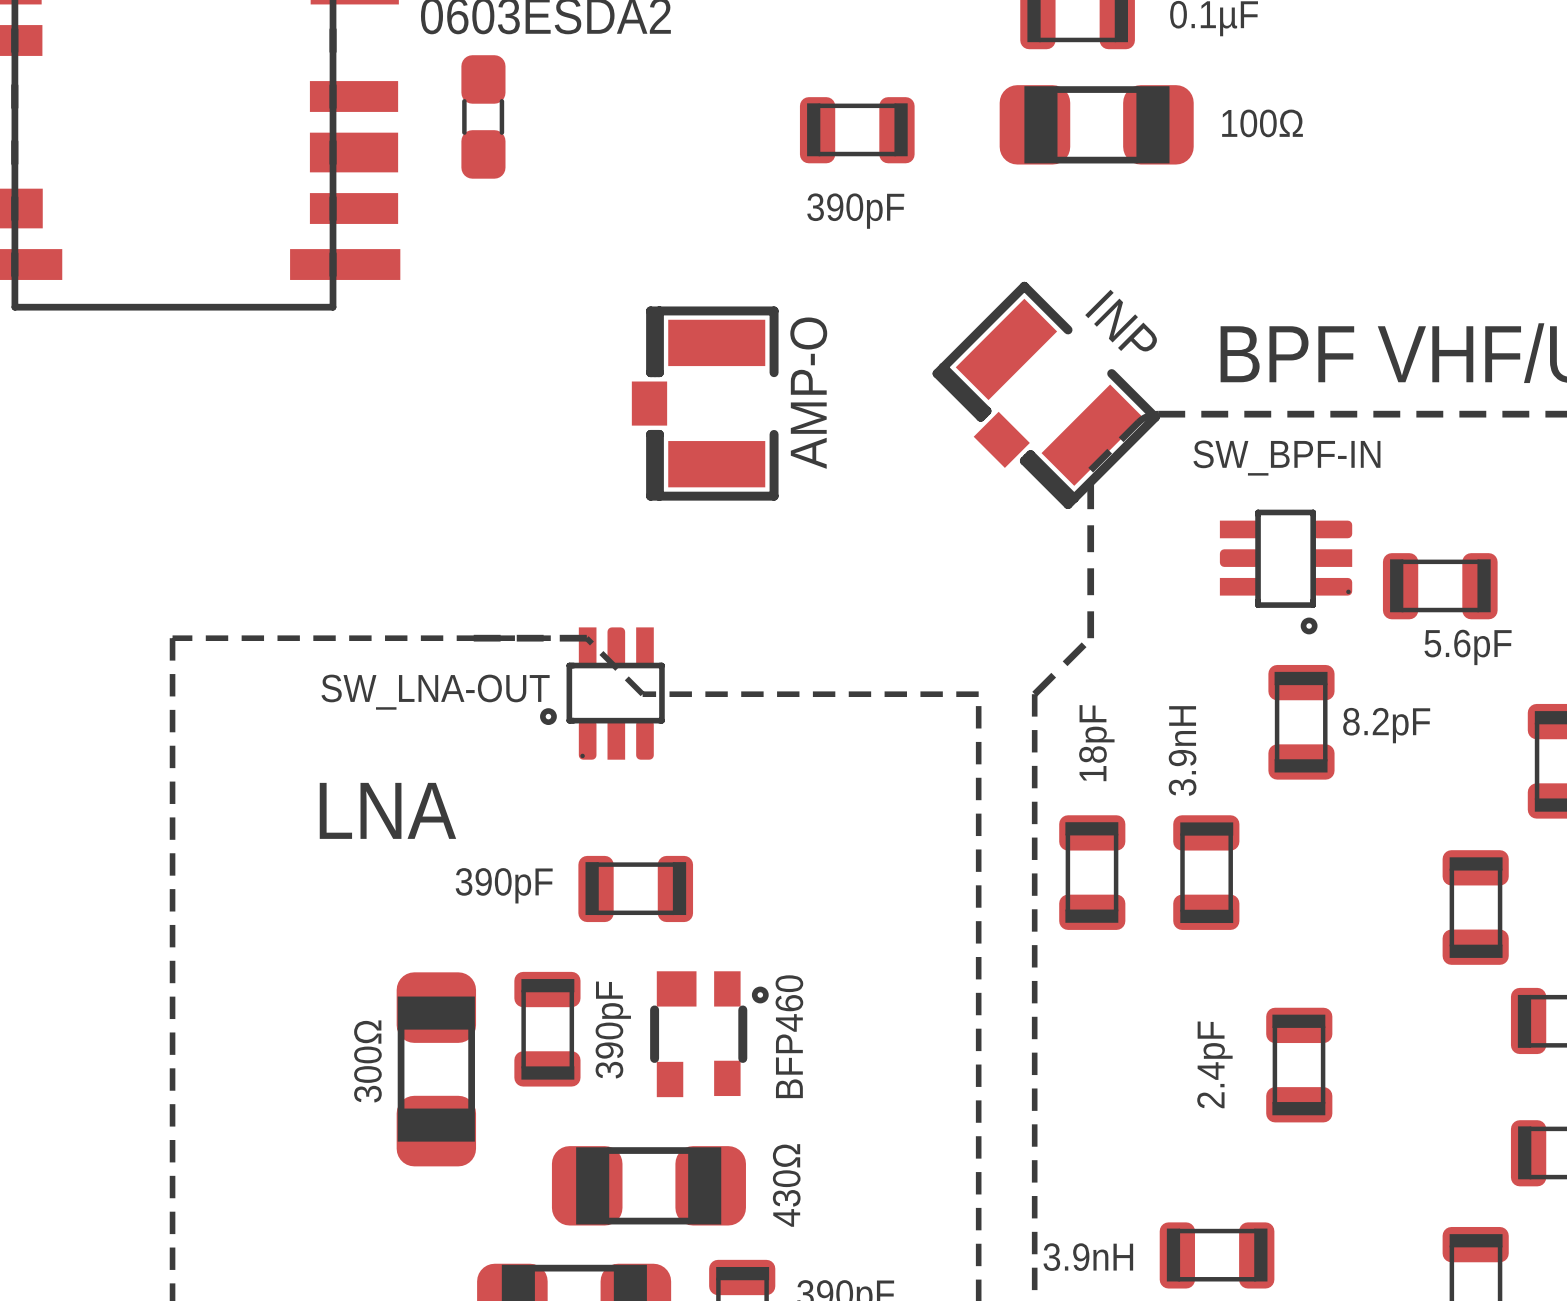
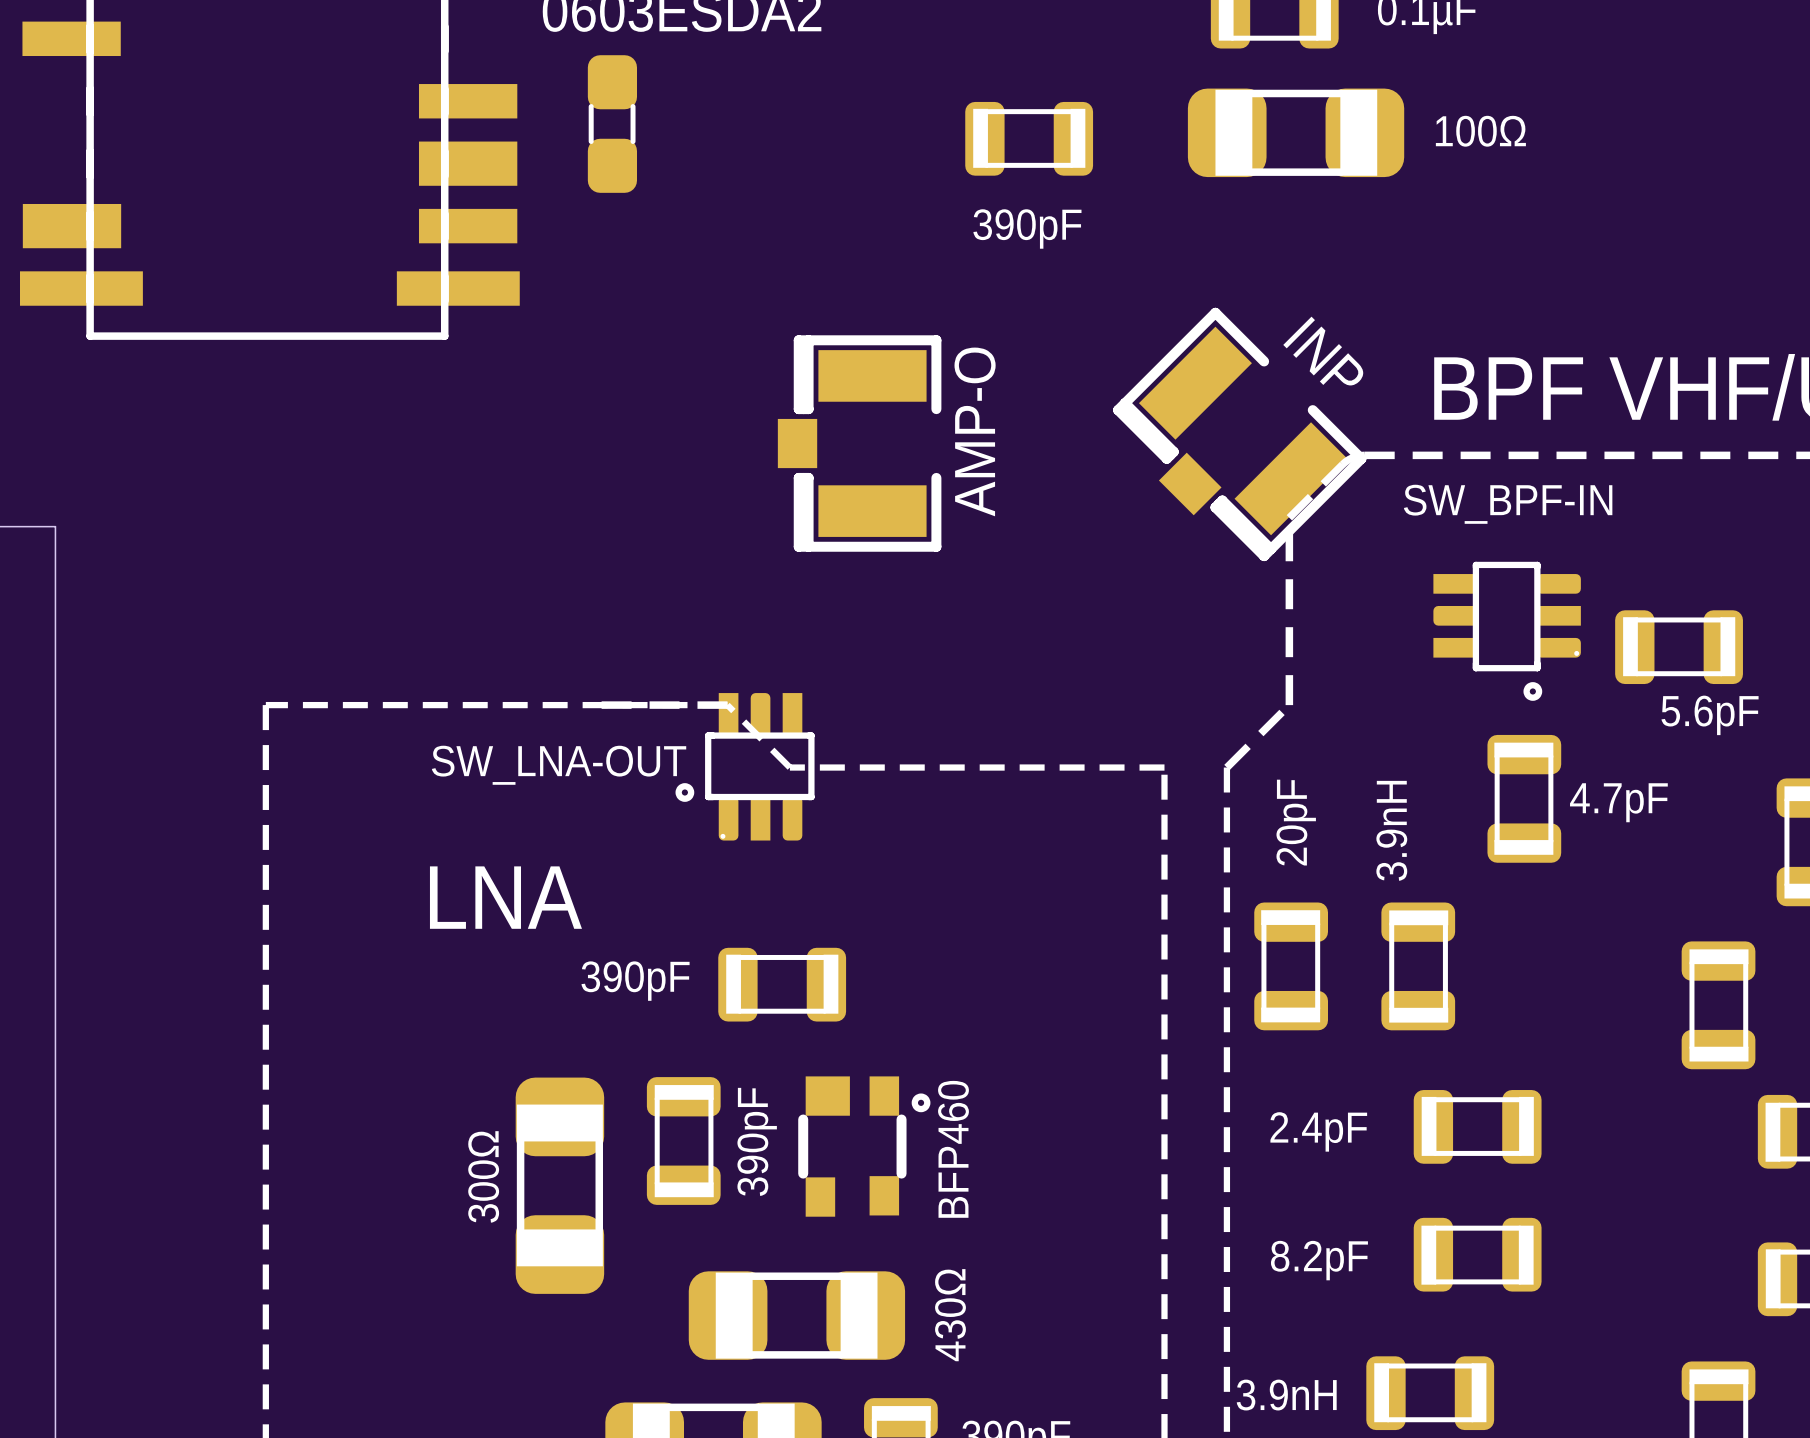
part value: 8.2pF (1386, 725) -> 4.7pF (1618, 802)
part value: 18pF (1096, 743) -> 20pF (1296, 822)
part rotation: 0° (1299, 1065) -> 90° clockwise (1477, 1126)
part: none -> 8.2pF (1477, 1254)

